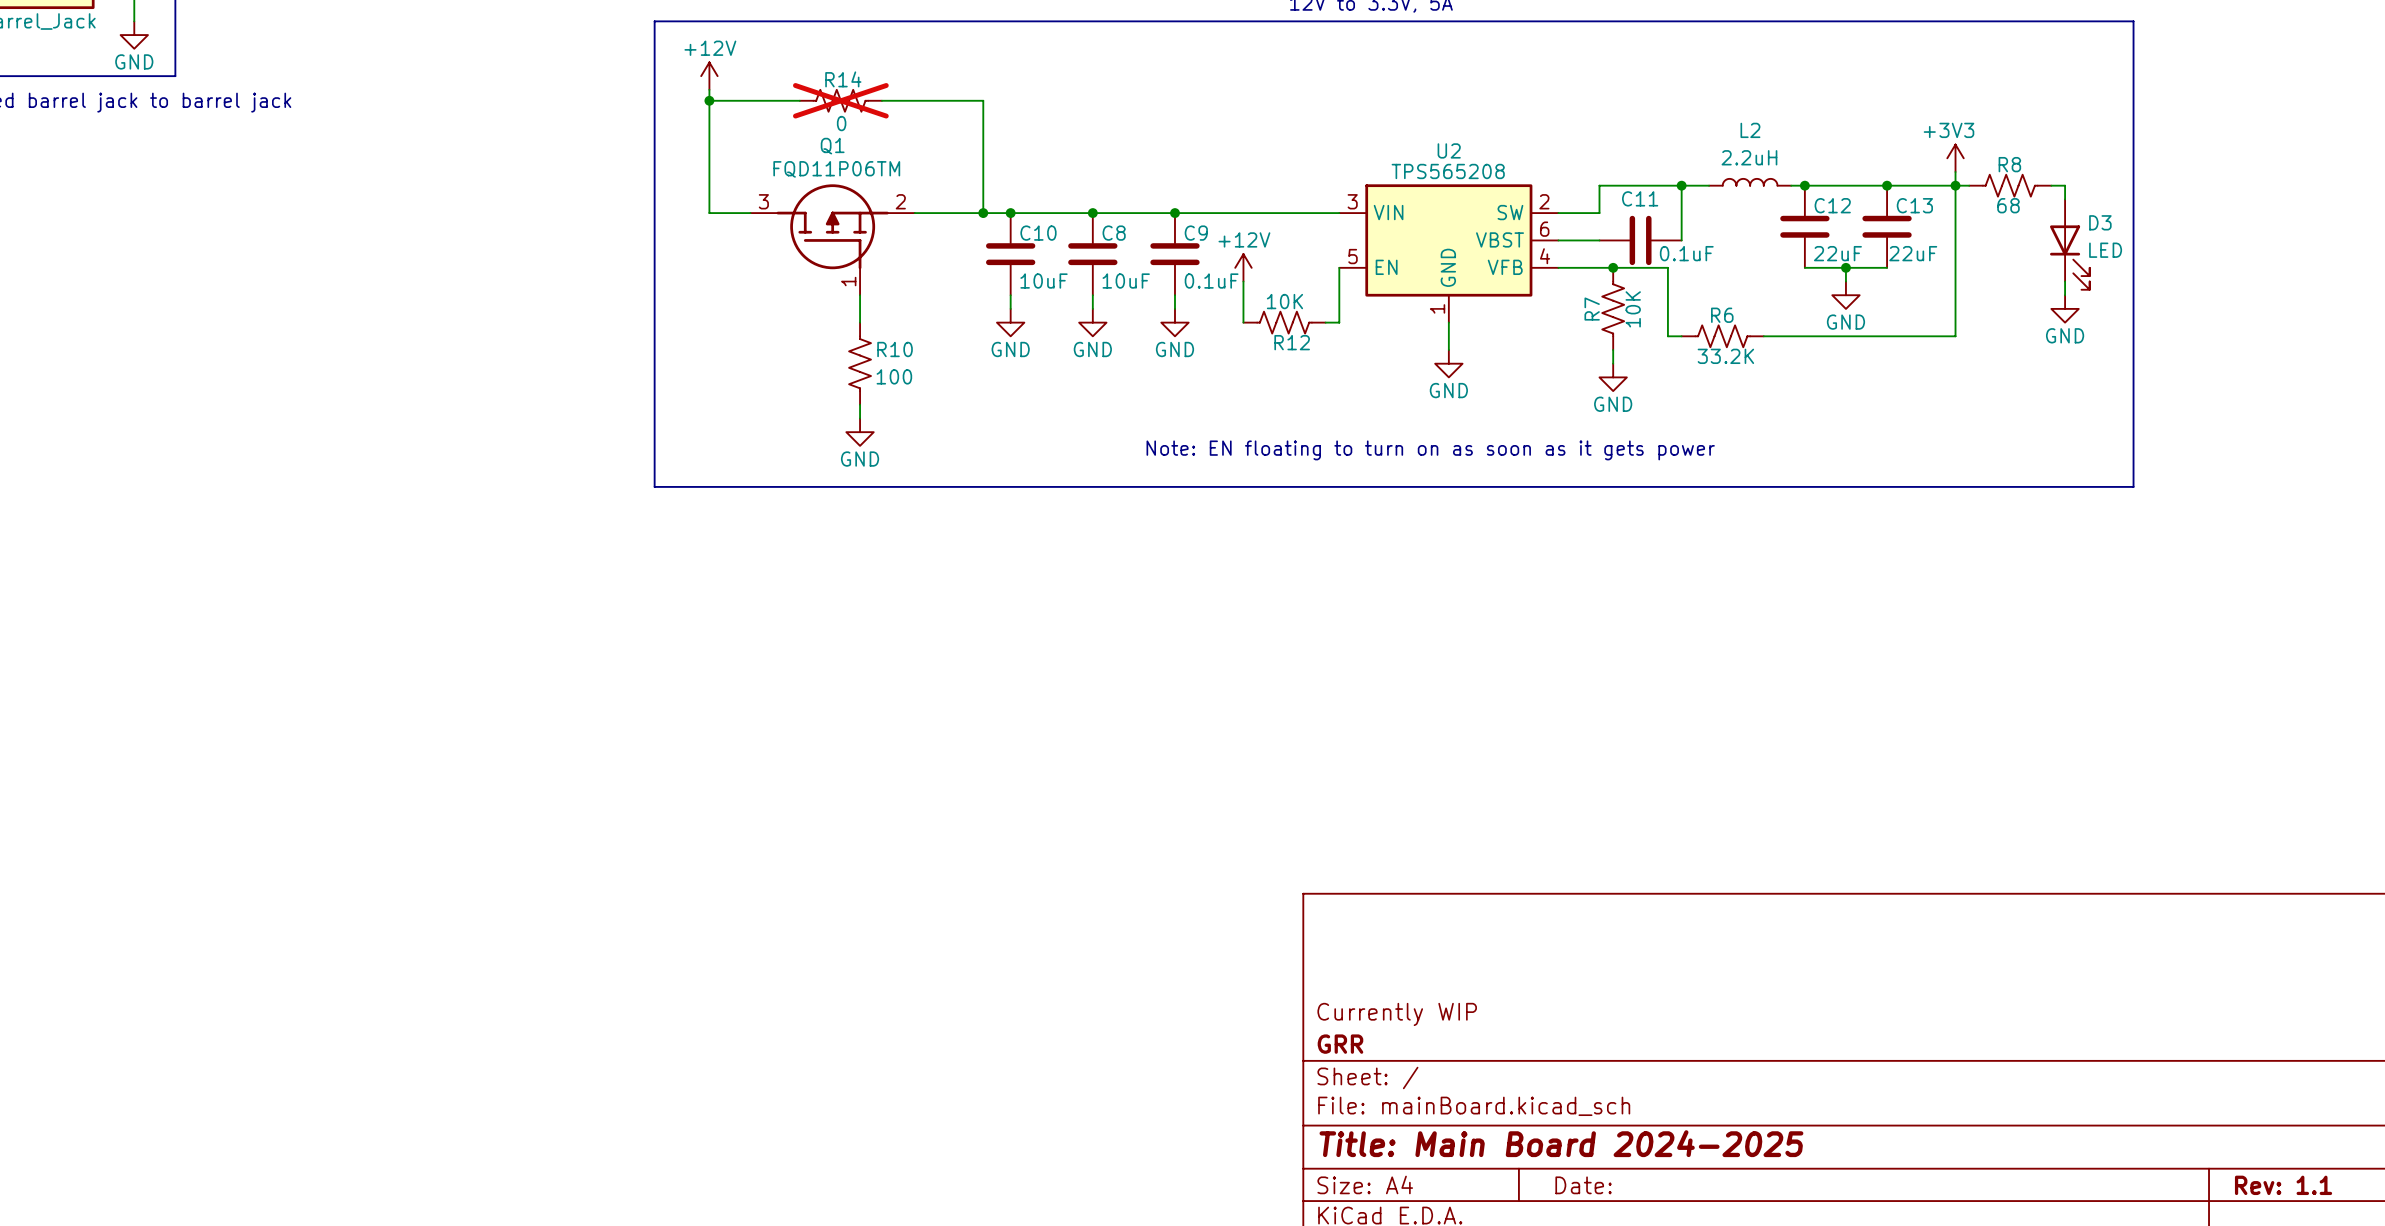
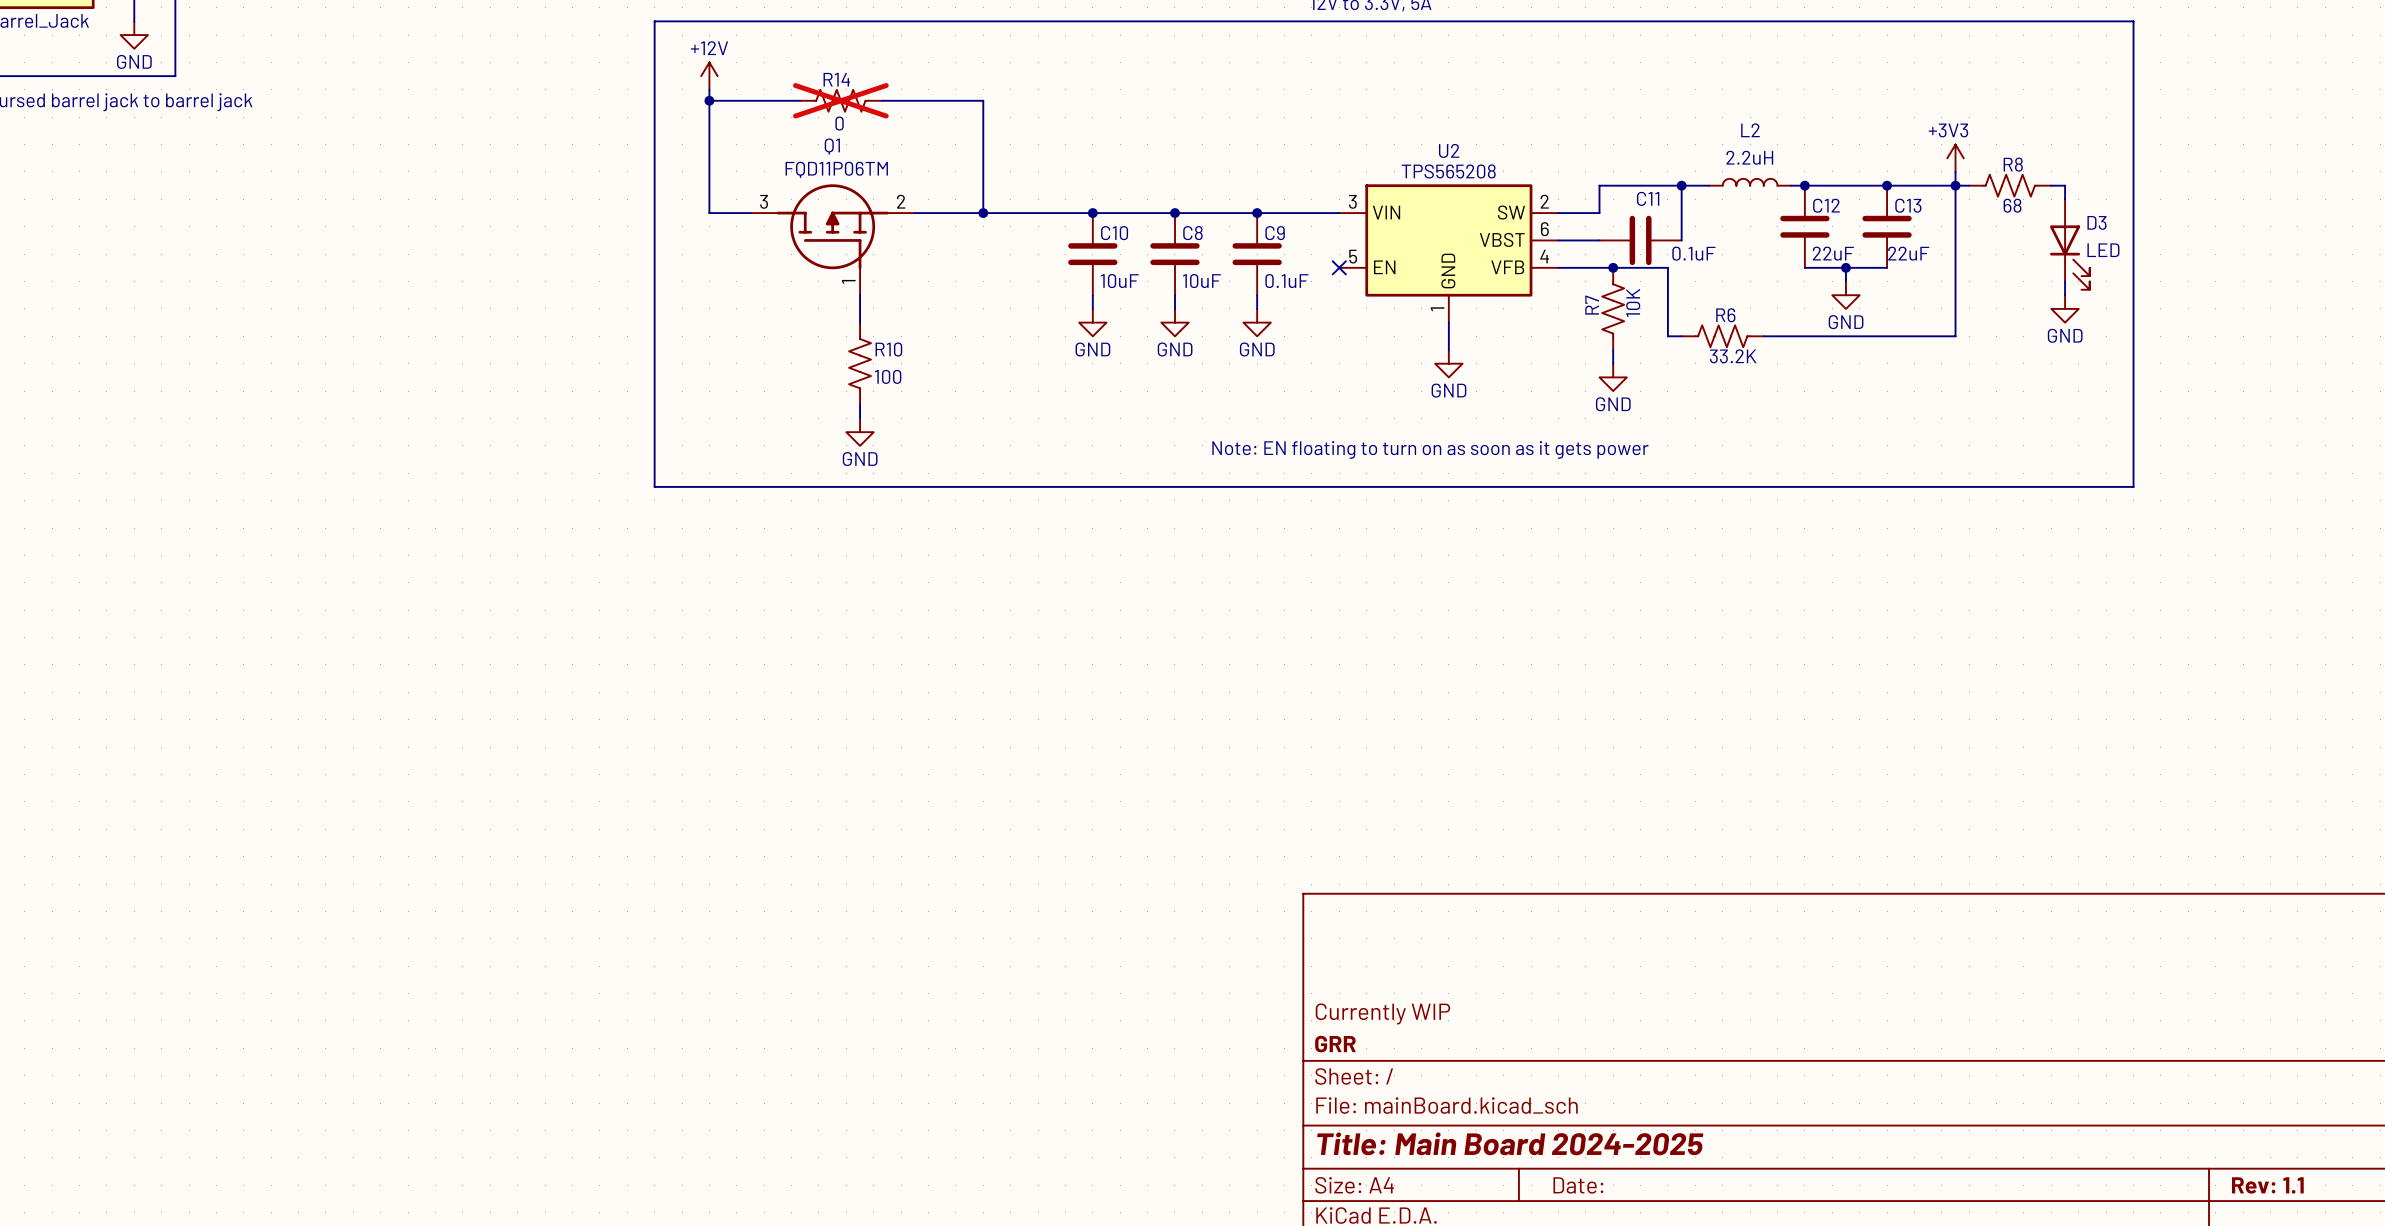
junction: (1010, 213) -> none
junction: none -> (1257, 213)
C8 name: C8 (1114, 233) -> C10 (1114, 233)
C9 name: C9 (1196, 233) -> C8 (1192, 233)
C10: 10uF (1010, 254) -> none
C9: none -> 0.1uF (1257, 254)
power symbol: +12V (1243, 267) -> none
wire: (1339, 267) (1339, 322) (1325, 322) -> none
no-connect mark: none -> (1339, 267)
C9 value: 0.1uF (1211, 281) -> 10uF (1201, 281)
wire: (1243, 281) (1243, 322) -> none
wire: (1010, 295) (1010, 308) -> (1257, 295) (1257, 308)
power symbol position: GND (1010, 322) -> GND (1257, 322)
R12: 10K (1284, 322) -> none

